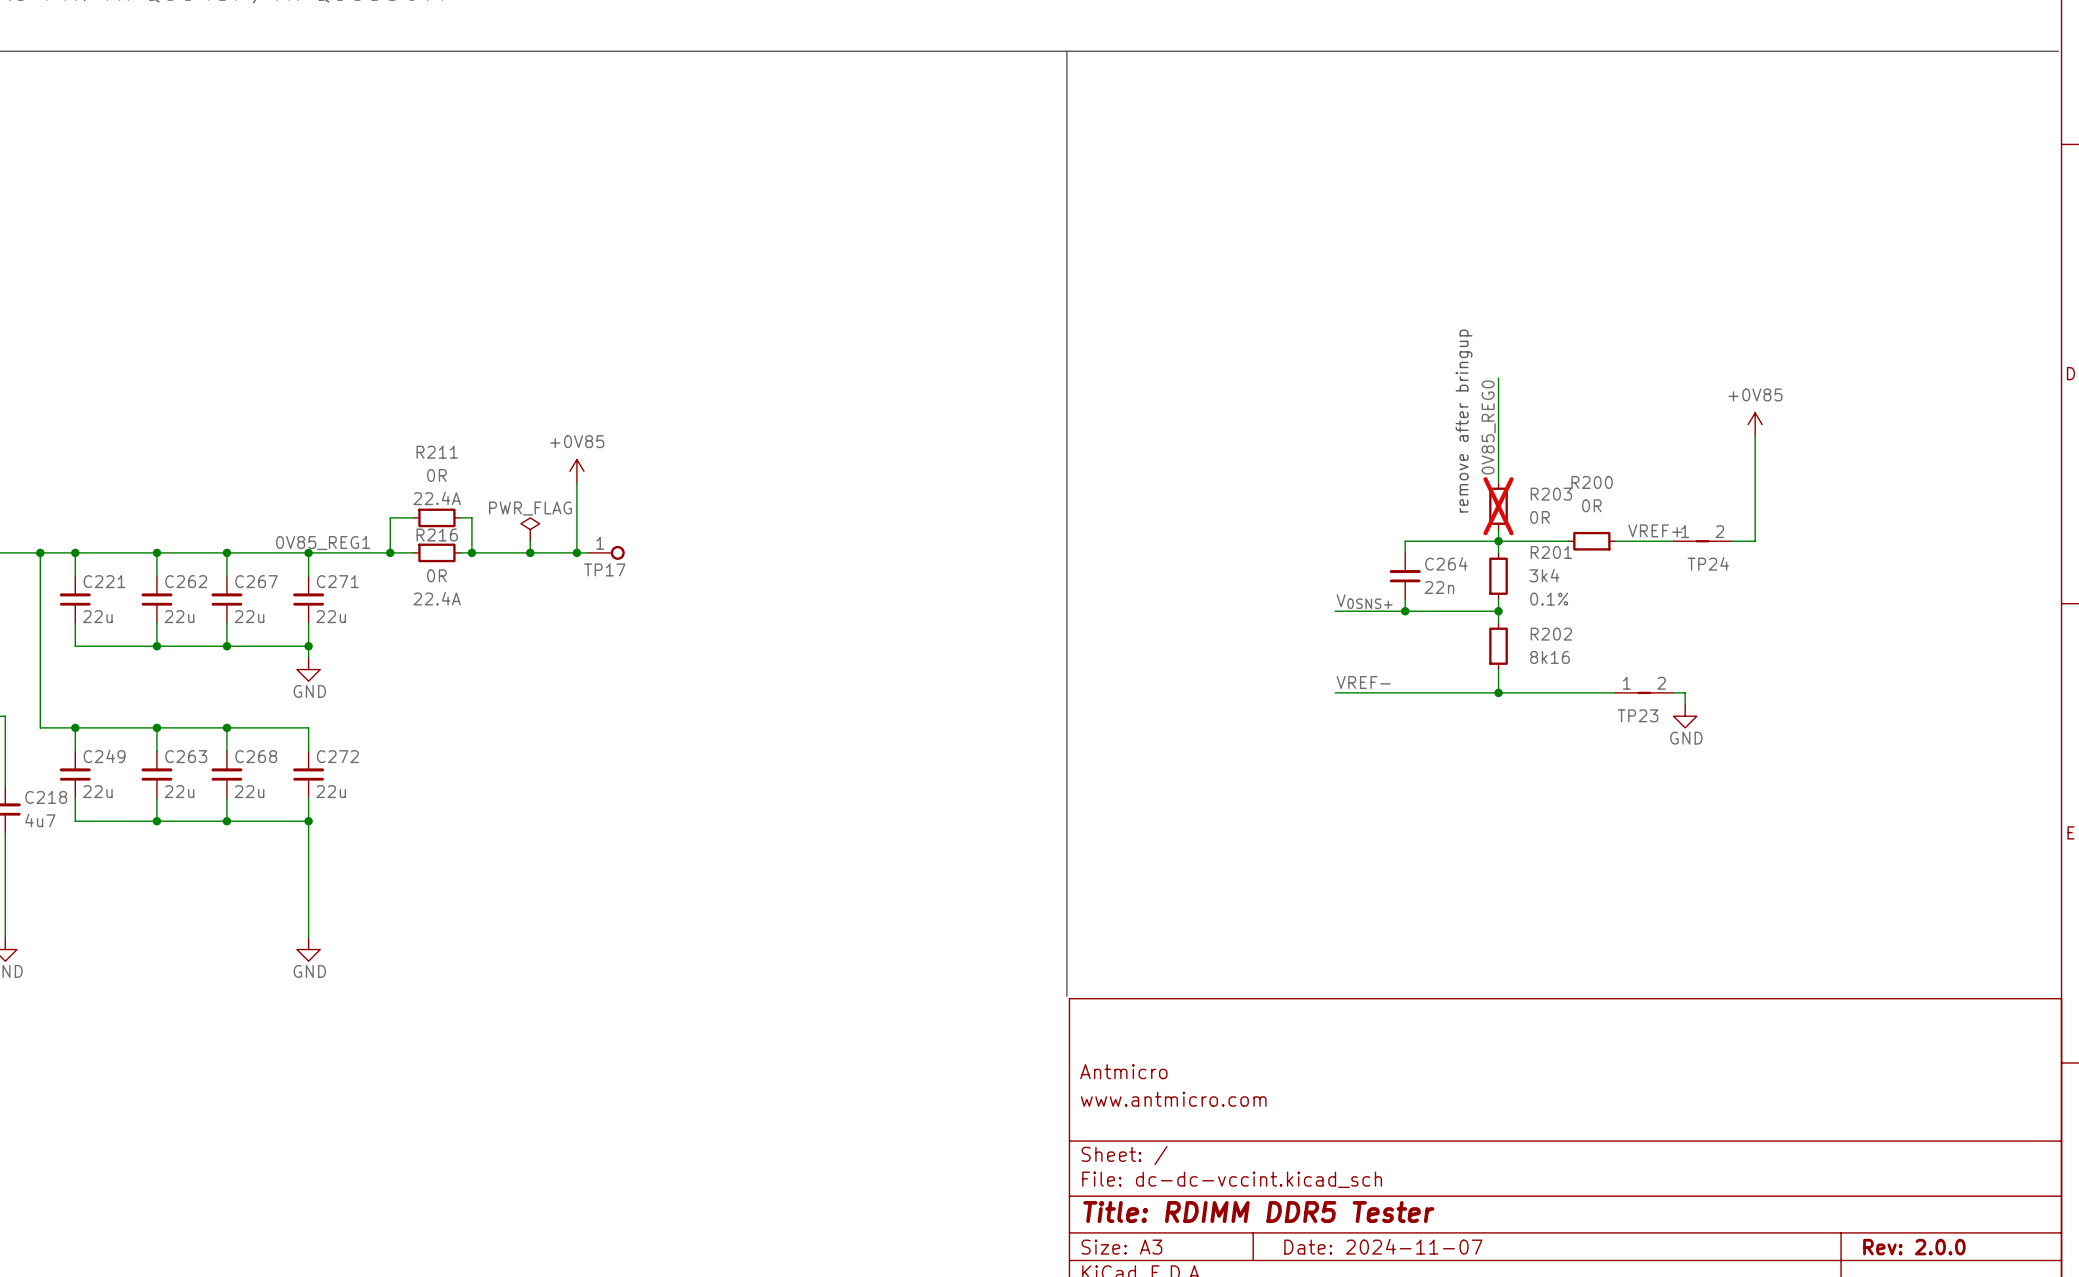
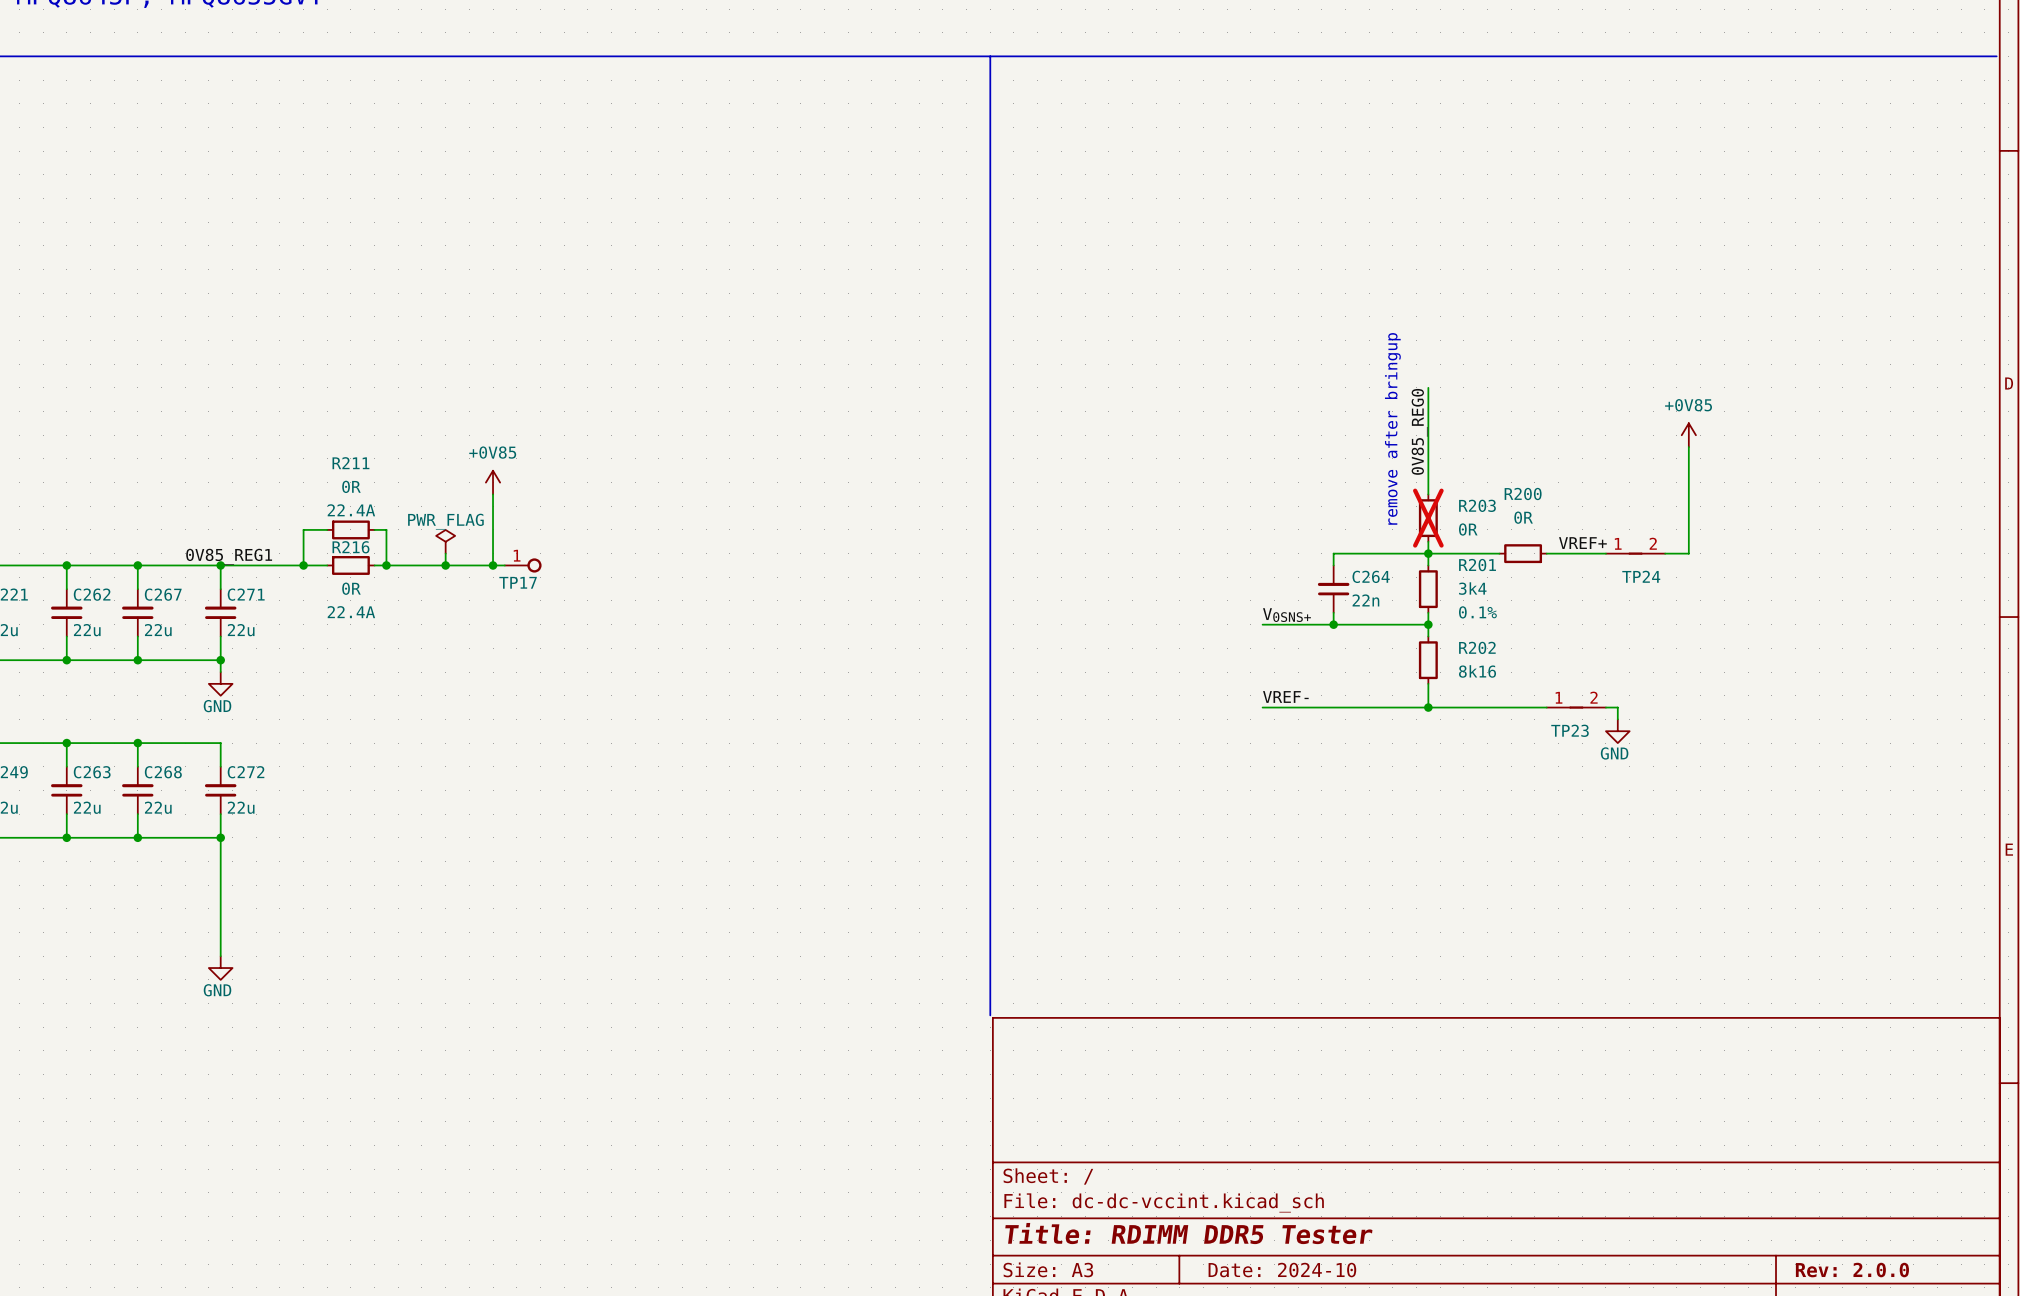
title block: Antmicro (1123, 1071) -> none
title block: www.antmicro.com (1173, 1099) -> none
title block: Date: 2024-11-07 (1383, 1246) -> Date: 2024-10 (1282, 1270)

